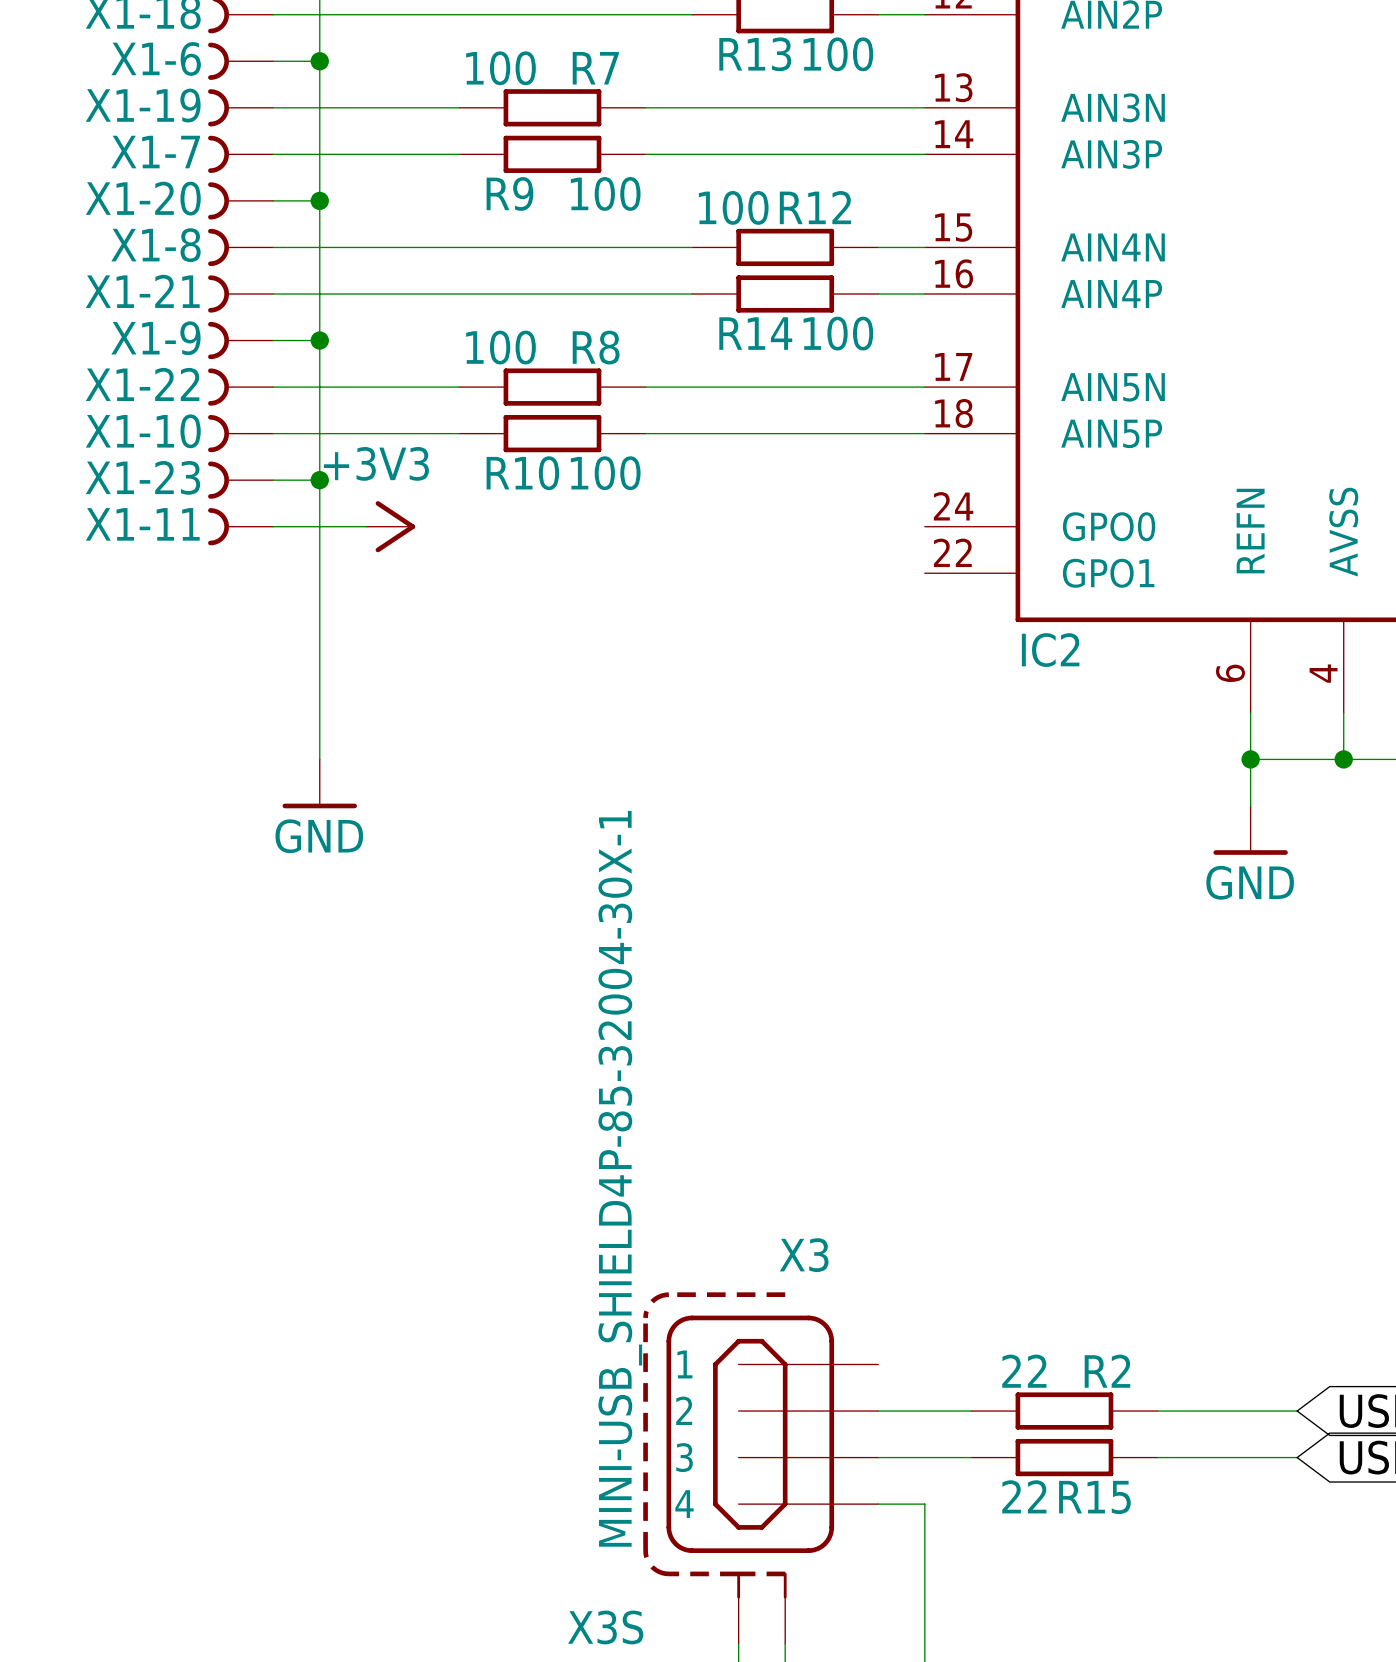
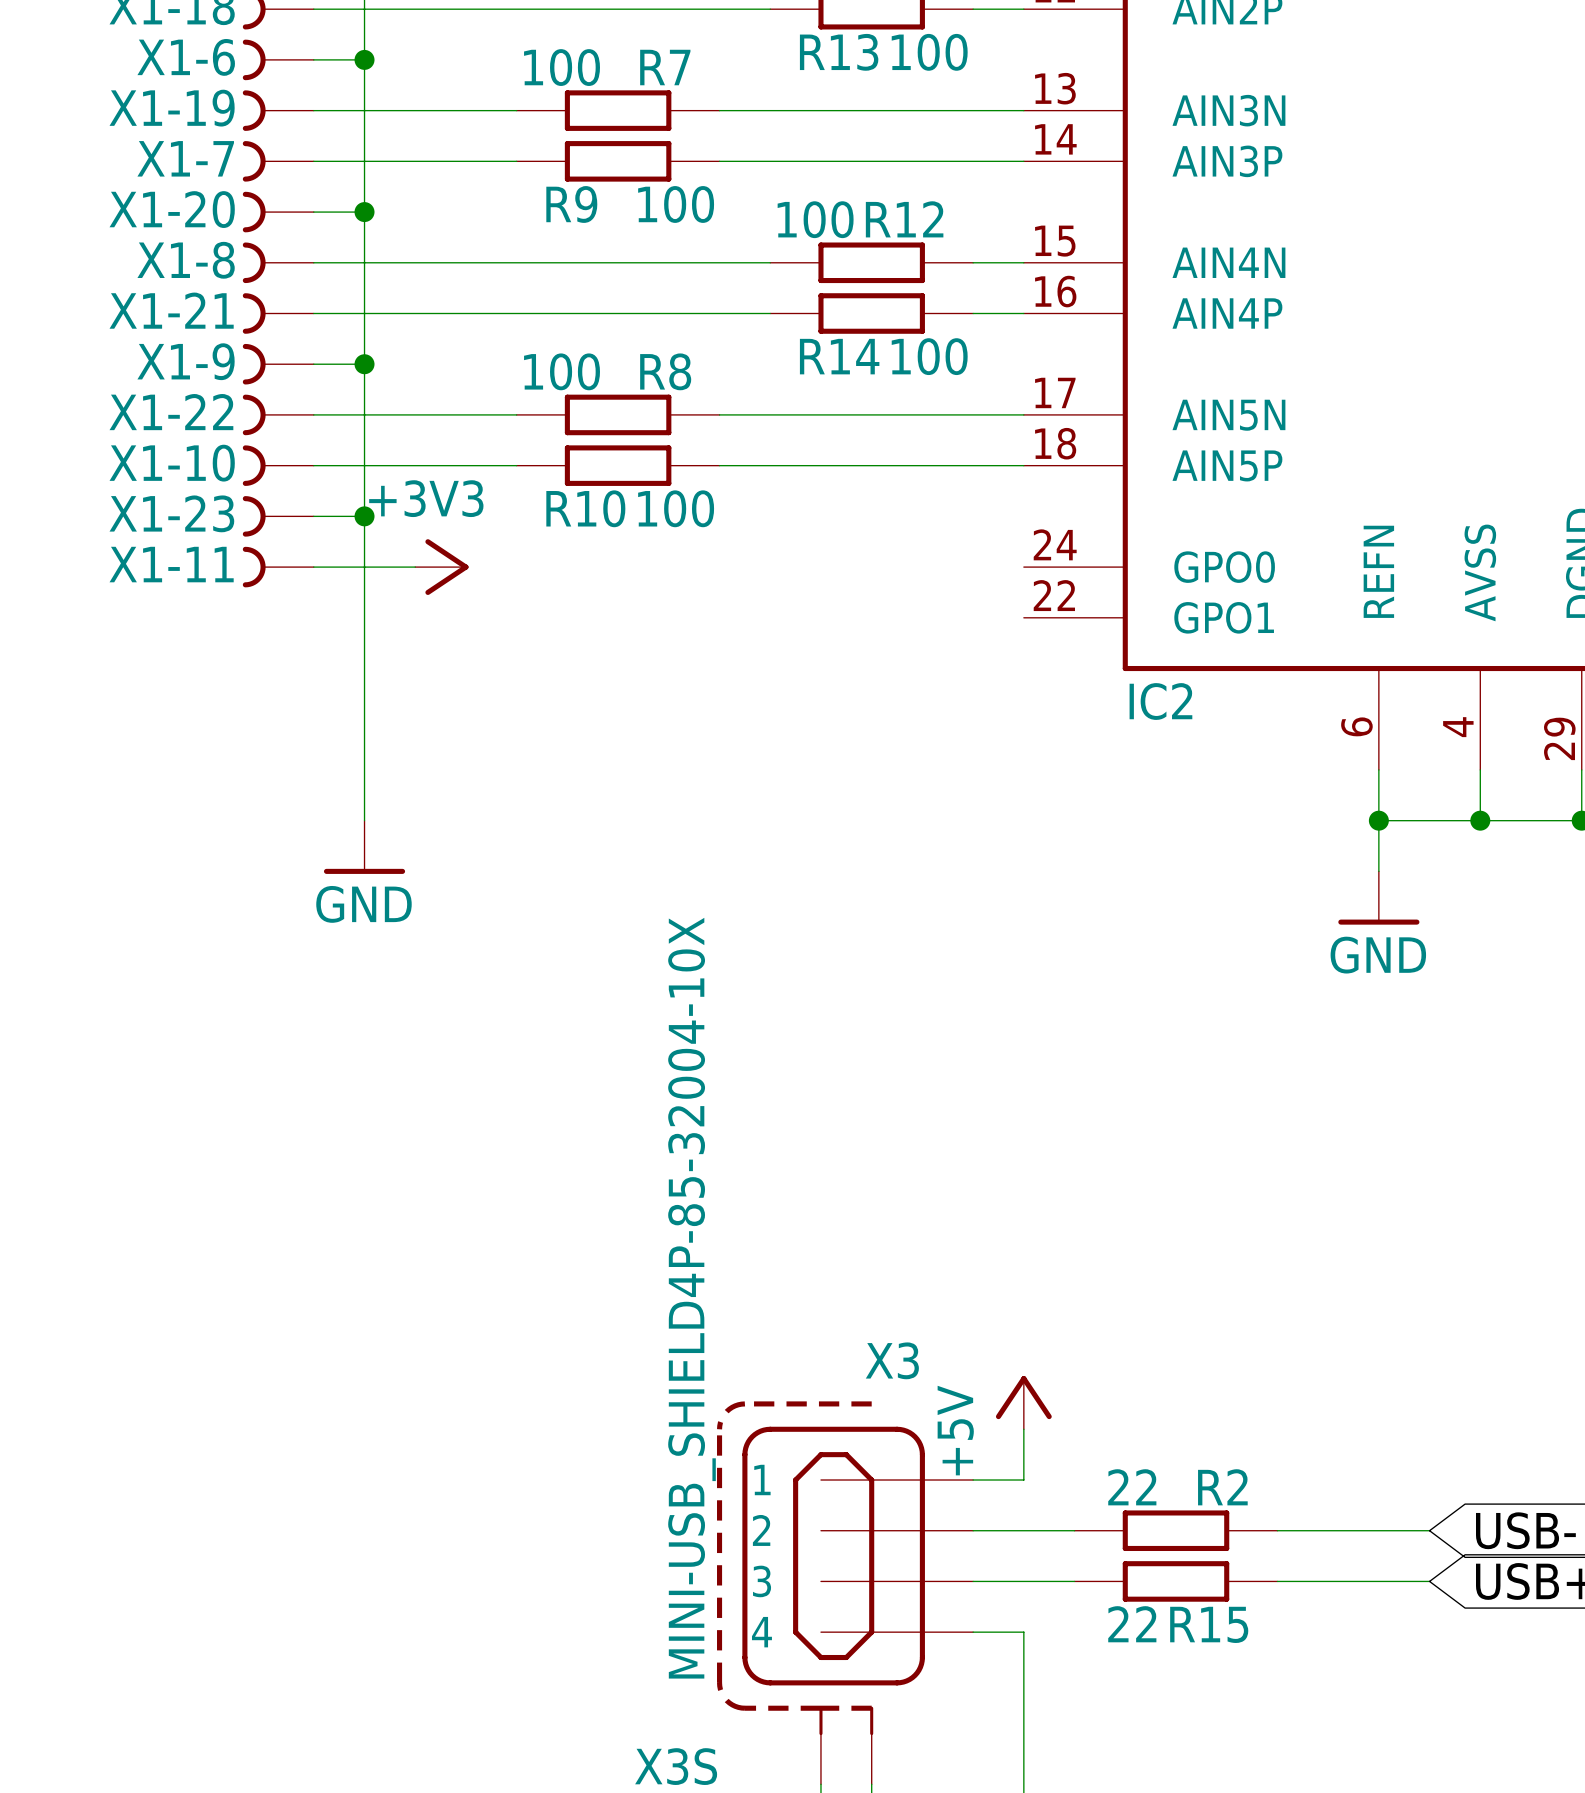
X3 value: MINI-USB_SHIELD4P-85-32004-30X-1 (620, 1178) -> MINI-USB_SHIELD4P-85-32004-10X (692, 1298)
power symbol: none -> +5V (1023, 1402)
wire: none -> (1023, 1429) (1023, 1480) (973, 1480)

